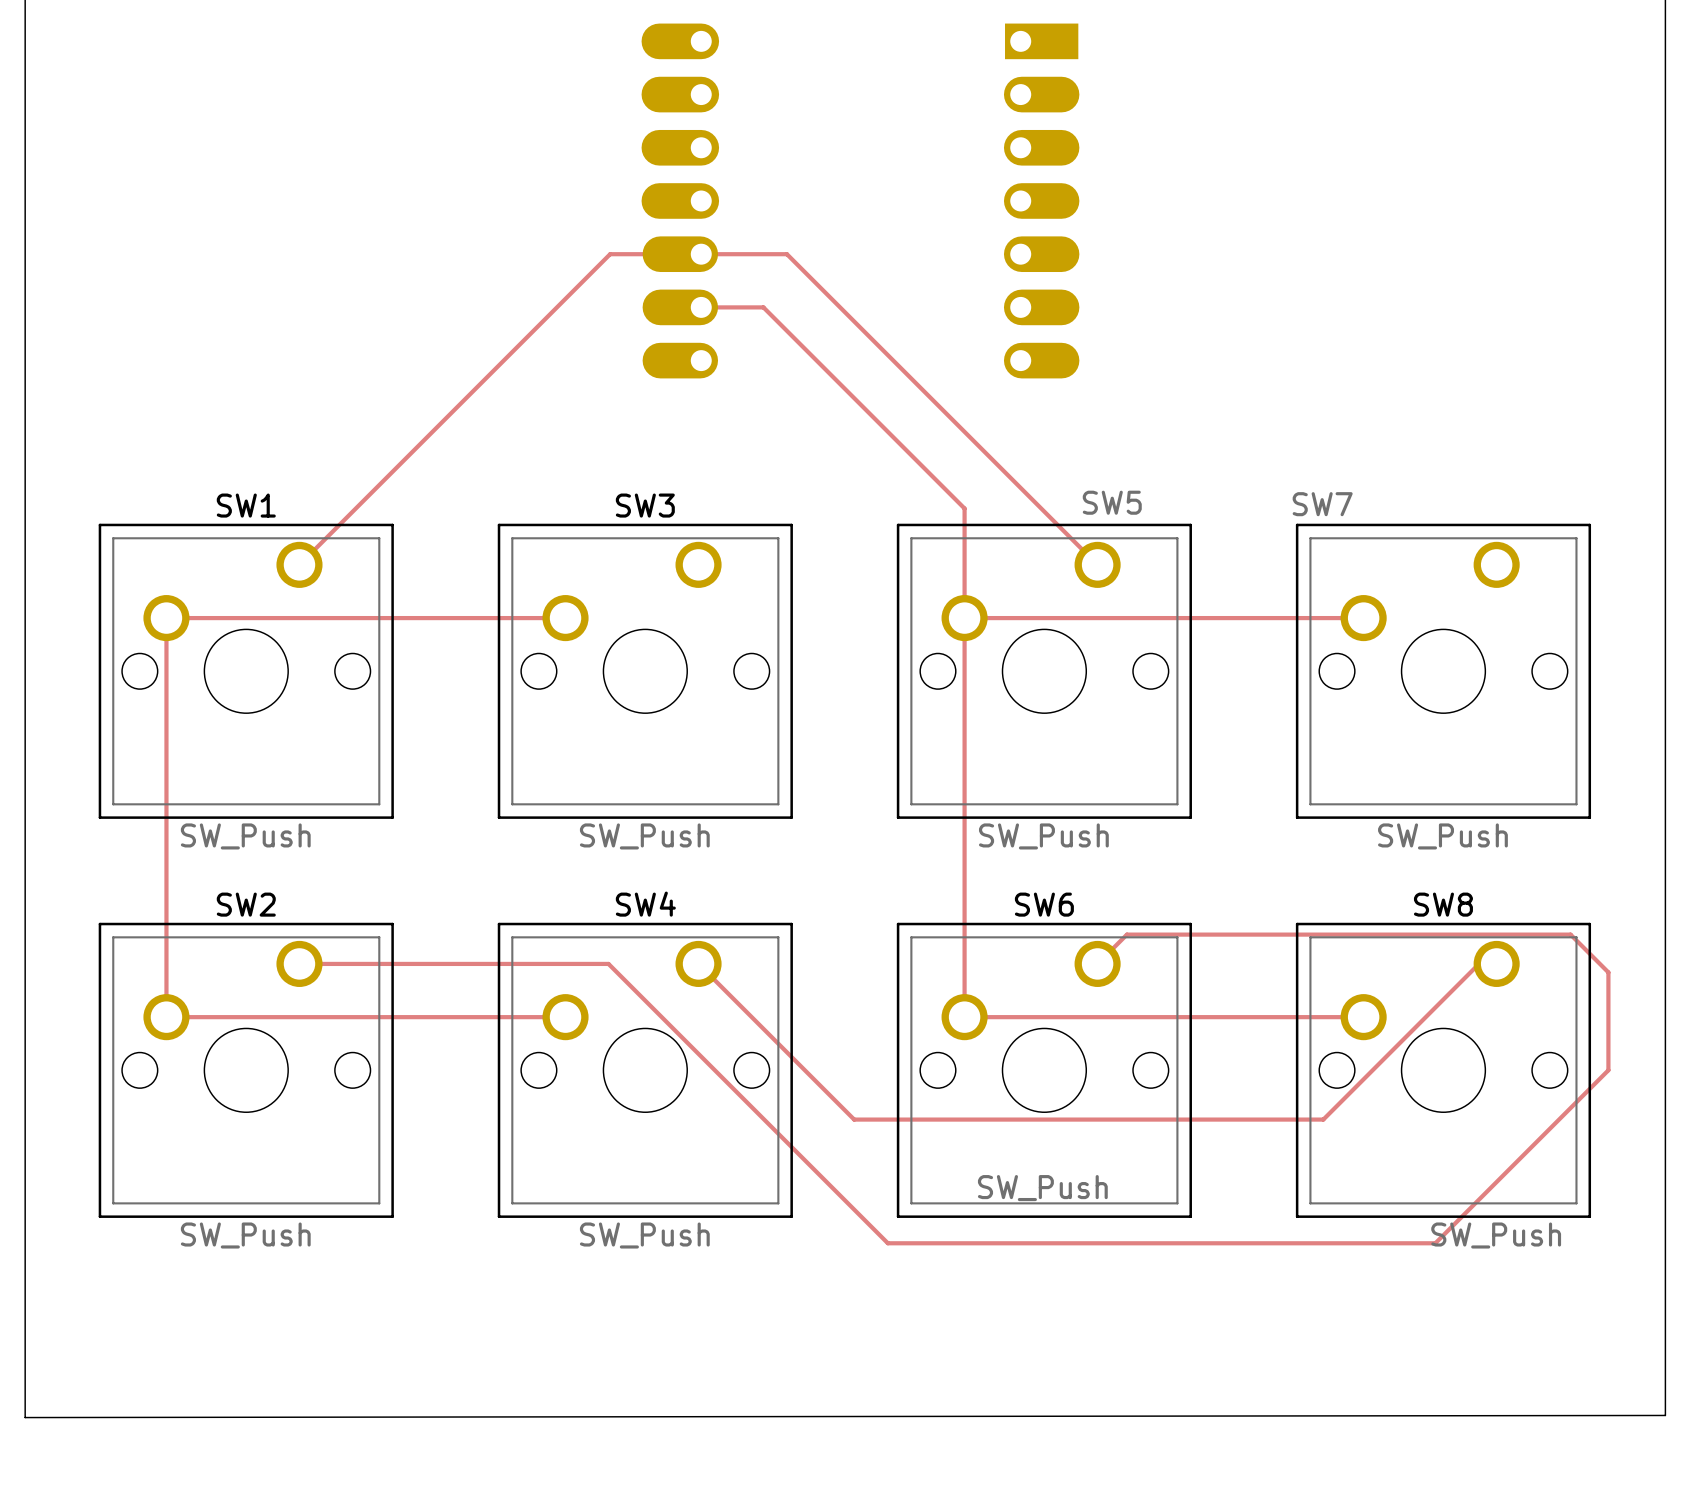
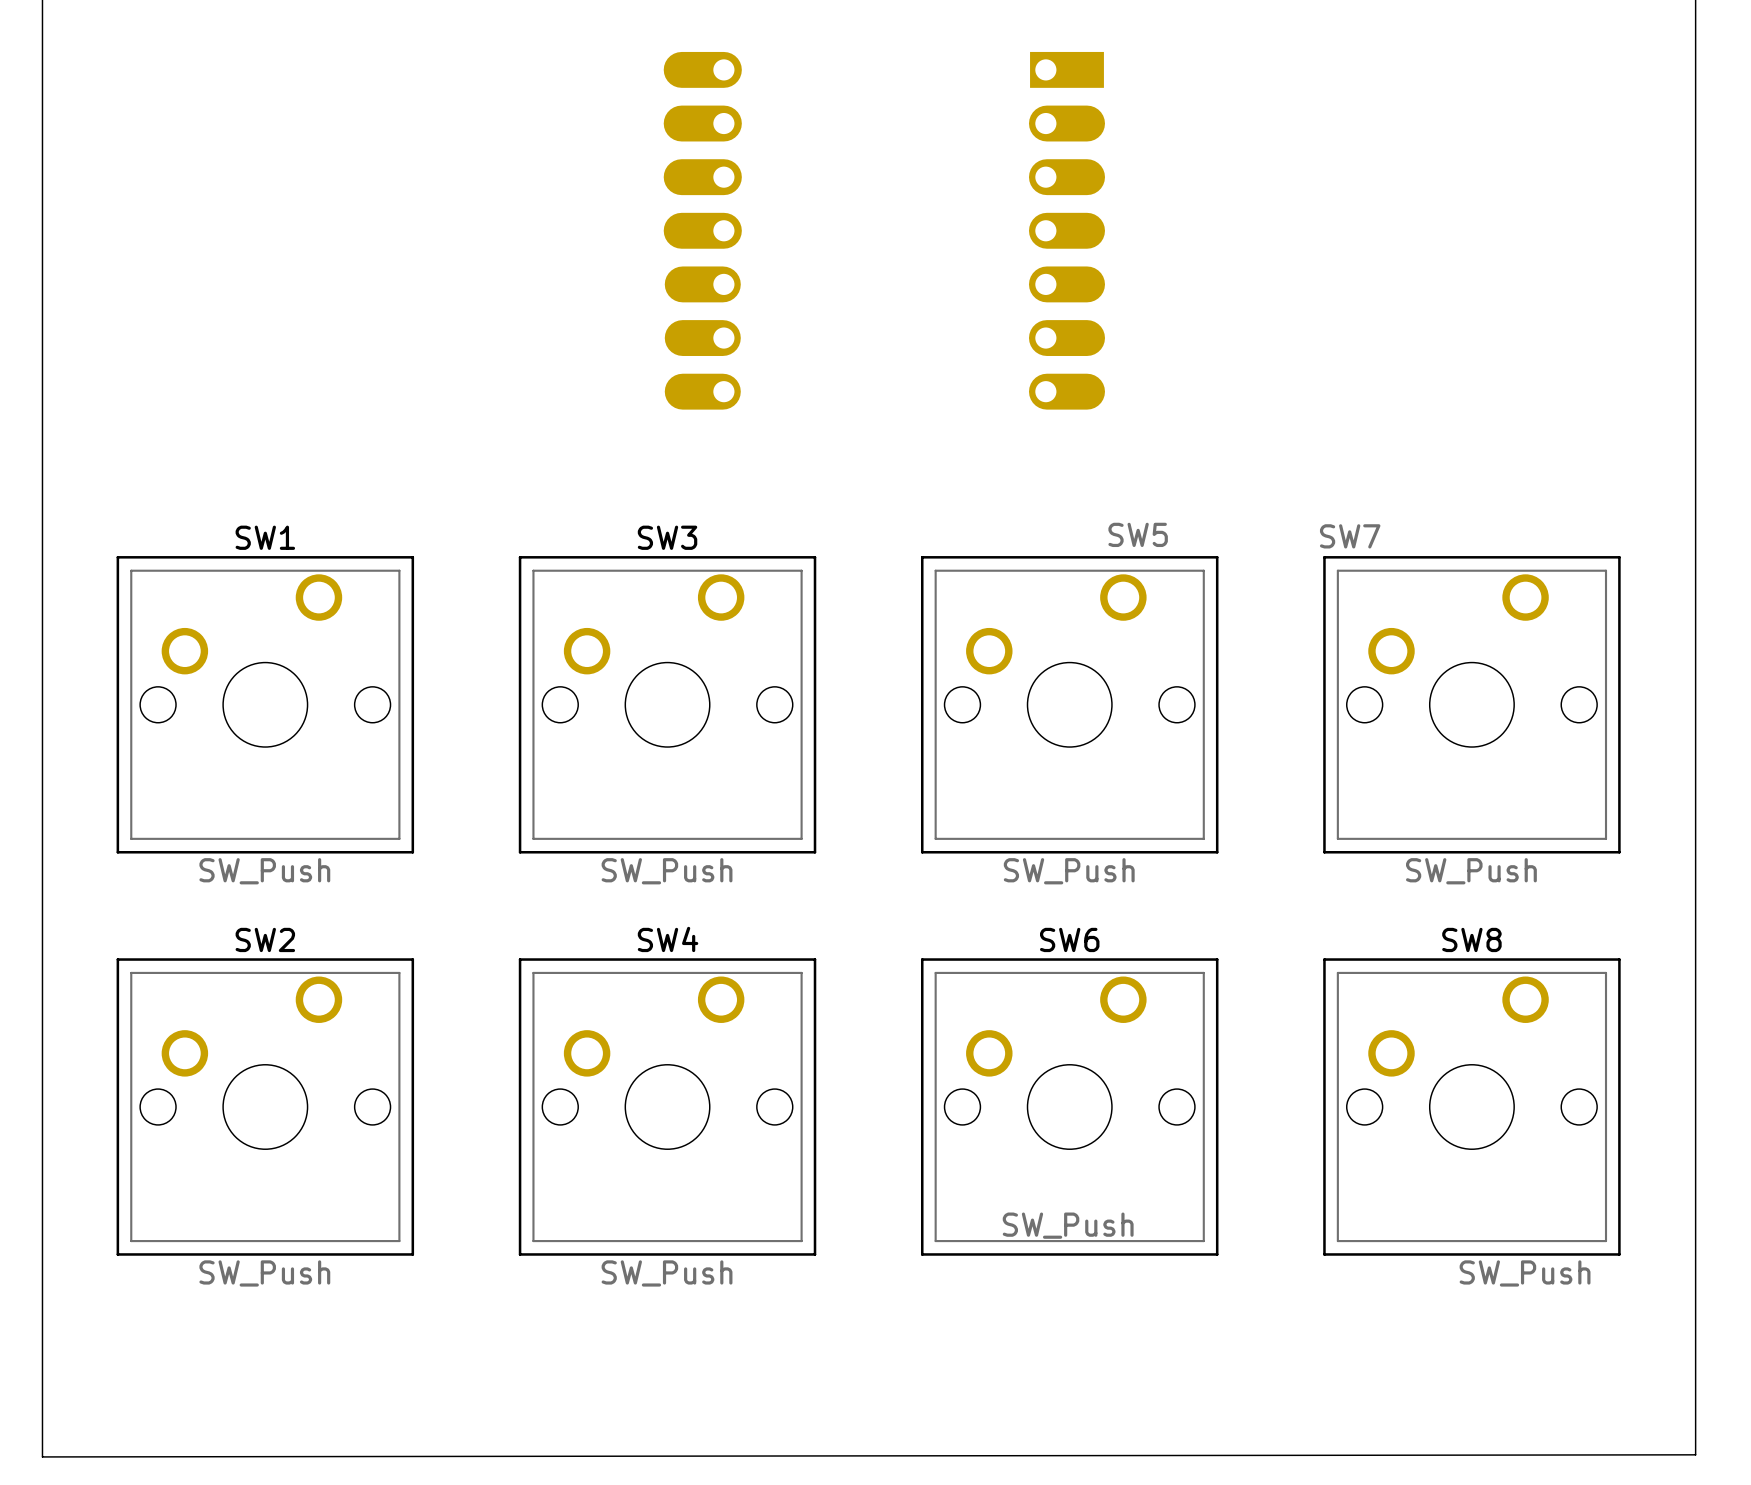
top track: (701, 307) (763, 307) (964, 508) (964, 1017) (1363, 1017) -> none
top track: (299, 564) (610, 254) (786, 254) (1097, 564) -> none
top track: (565, 618) (166, 618) (166, 1017) (565, 1017) -> none
top track: (964, 618) (1363, 618) -> none
top track: (299, 963) (608, 963) (887, 1243) (1435, 1243) (1608, 1070) (1608, 972) (1570, 934) (1126, 934) (1097, 963) -> none
top track: (698, 963) (854, 1119) (1323, 1119) (1479, 963) (1496, 963) -> none

